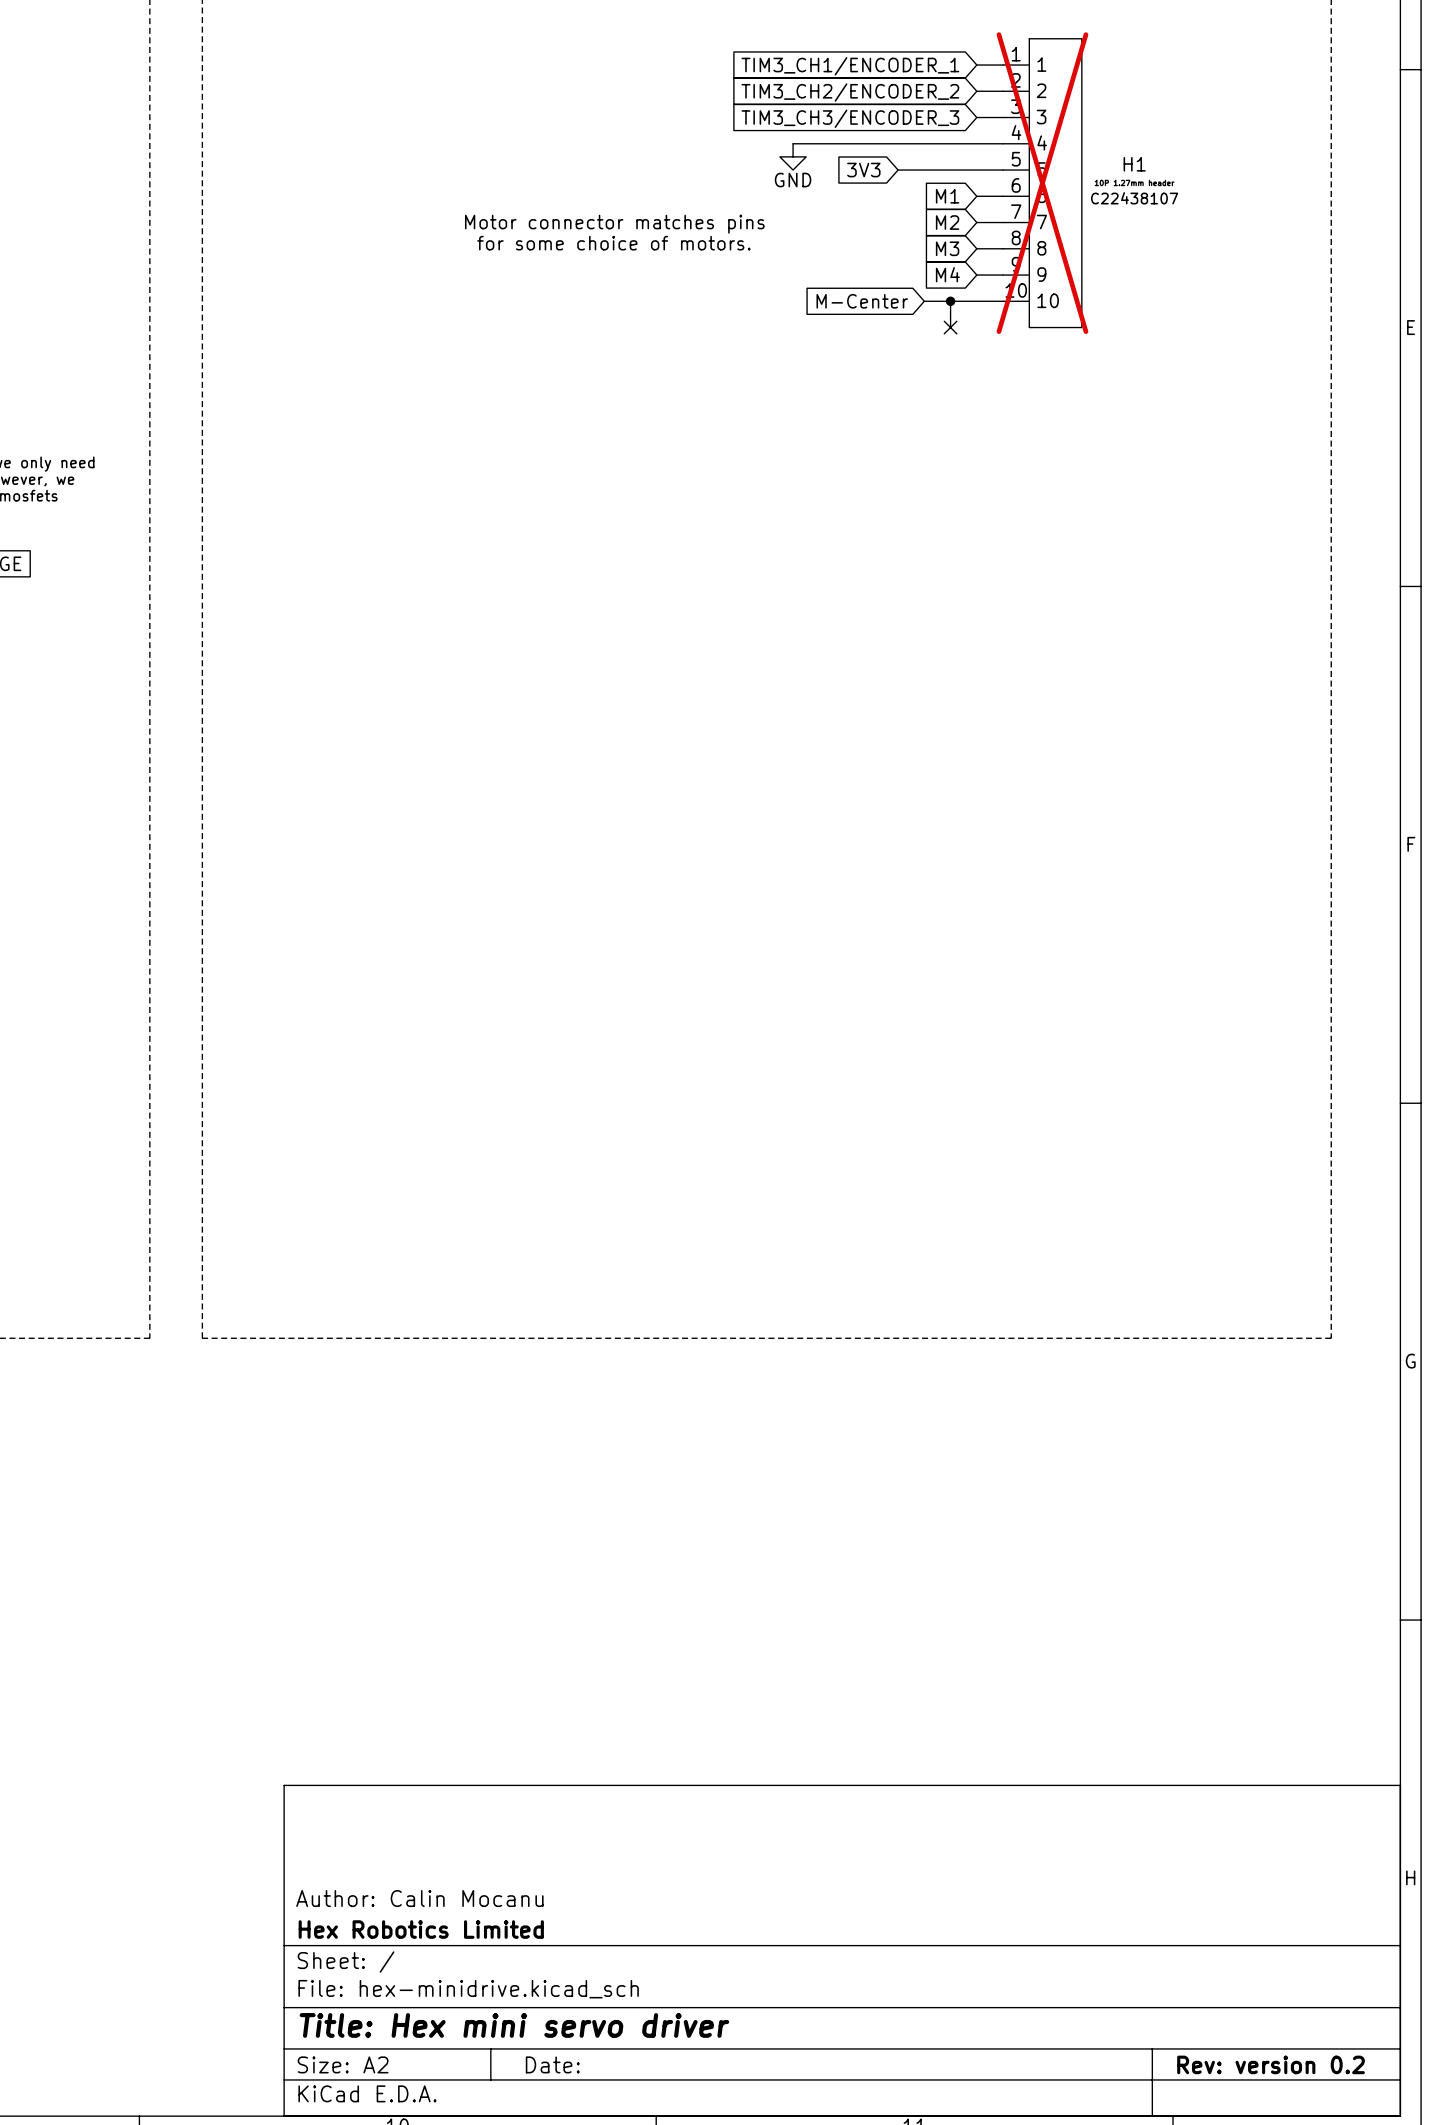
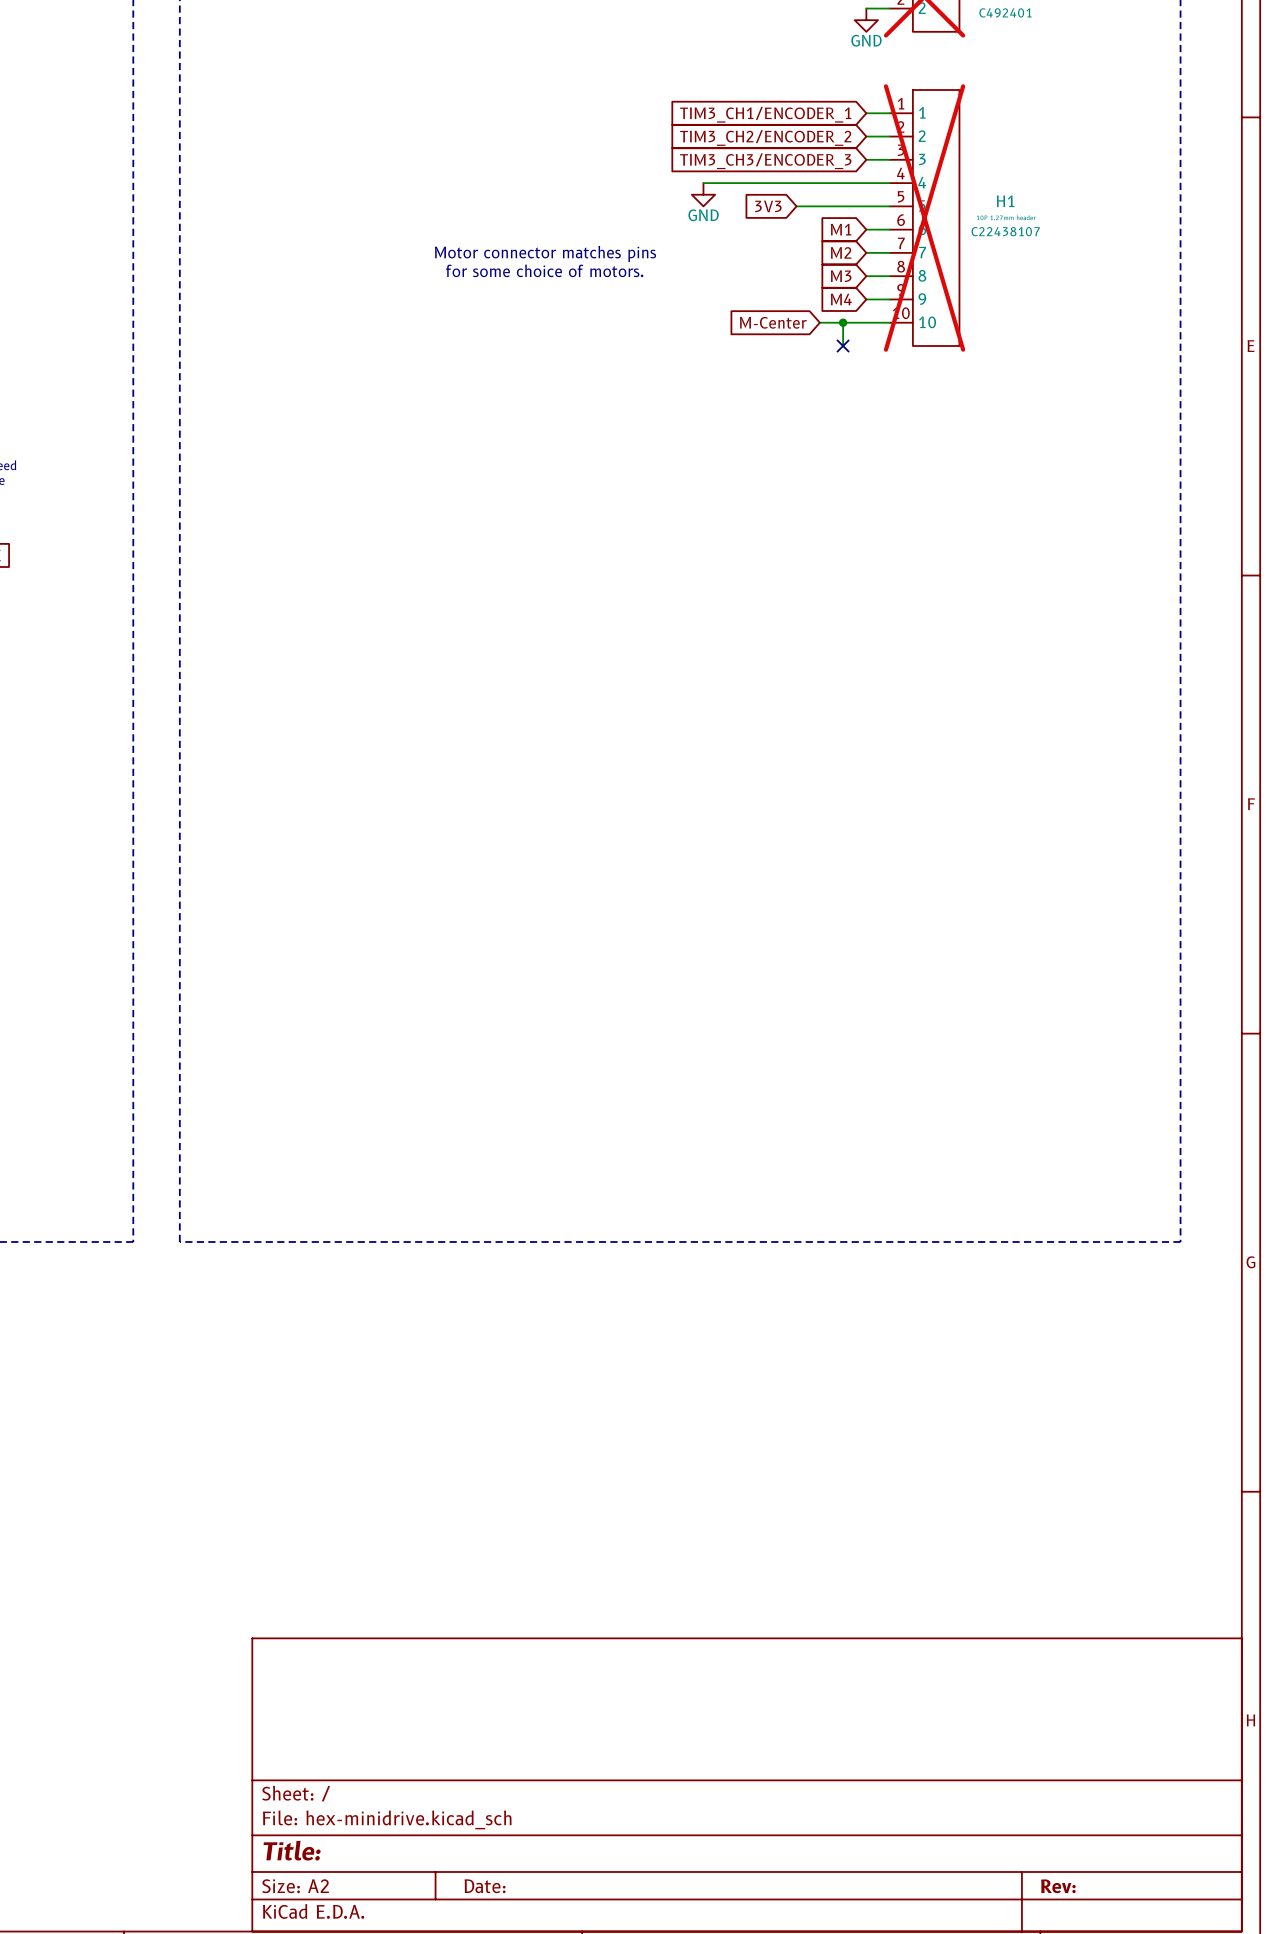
title block: Author: Calin Mocanu (419, 1898) -> none
title block: Hex Robotics Limited (421, 1929) -> none
title block: Title: Hex mini servo driver (514, 2025) -> Title: (292, 1850)
title block: Rev: version 0.2 (1271, 2064) -> Rev: (1058, 1886)

